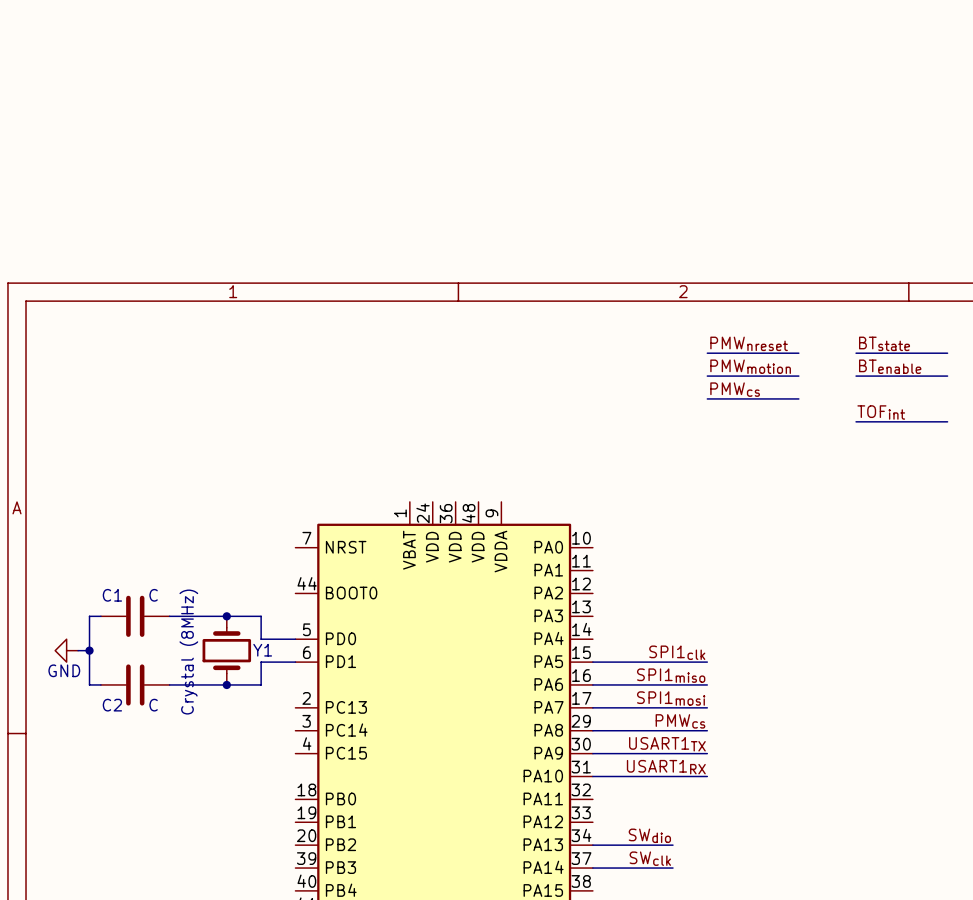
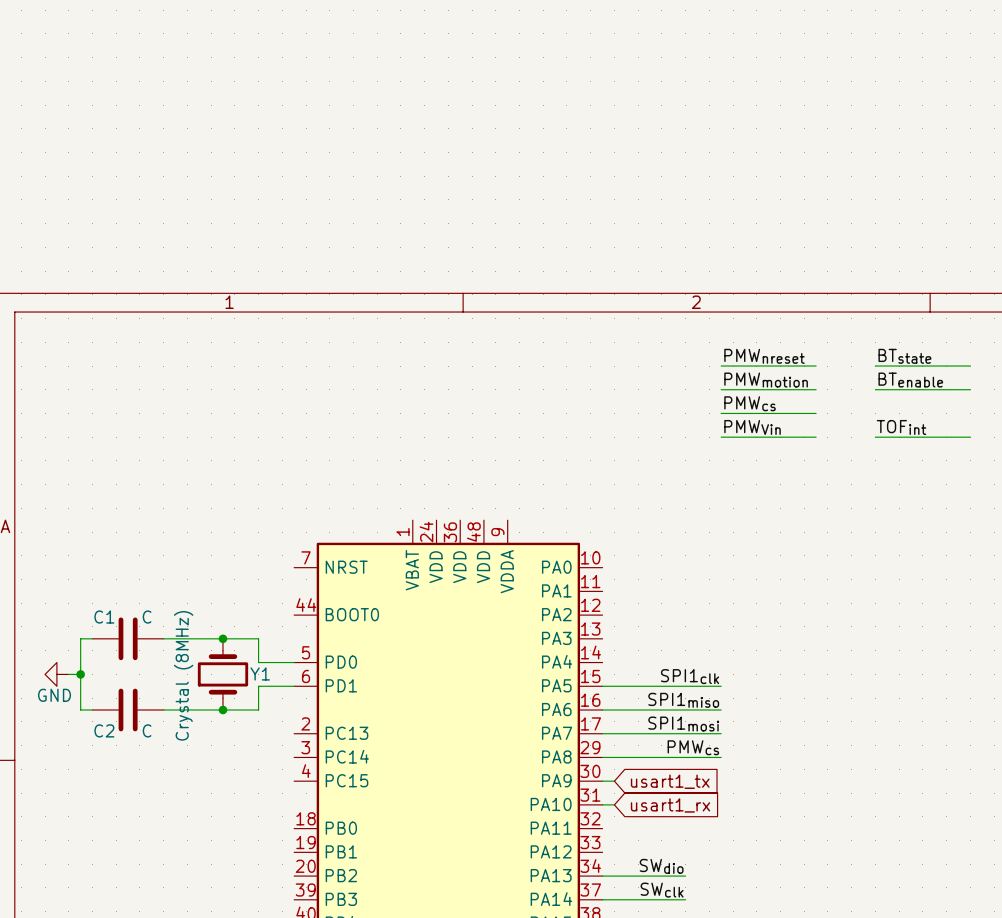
label: none -> PMWVin (752, 427)
wire: none -> (721, 437) (816, 437)
label: USART1TX (667, 744) -> none
wire: (604, 753) (707, 753) -> none
global label: none -> usart1_tx (670, 781)
label: USART1RX (666, 767) -> none
wire: (604, 776) (707, 776) -> none
global label: none -> usart1_rx (670, 805)

